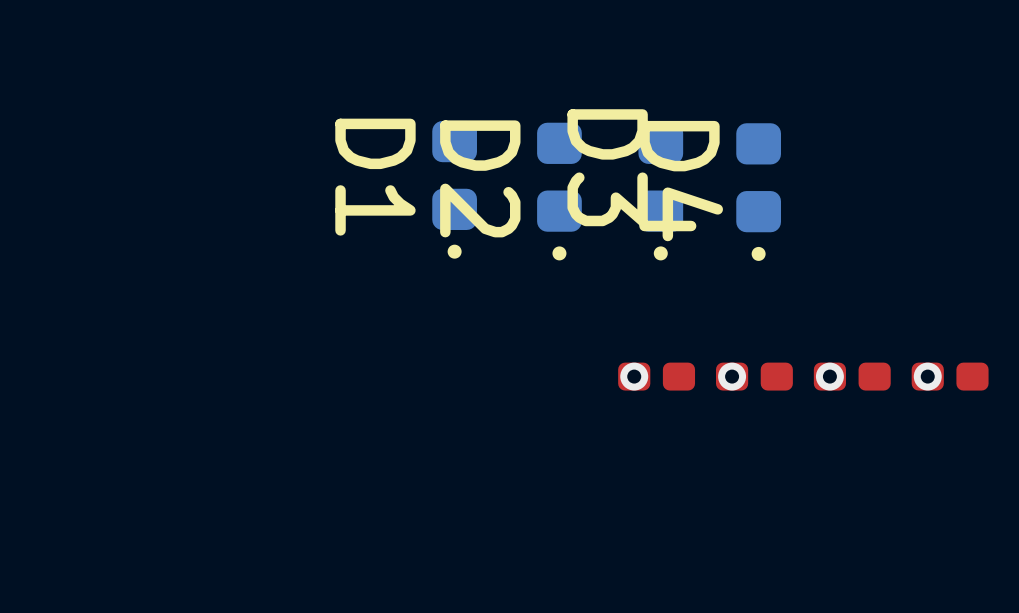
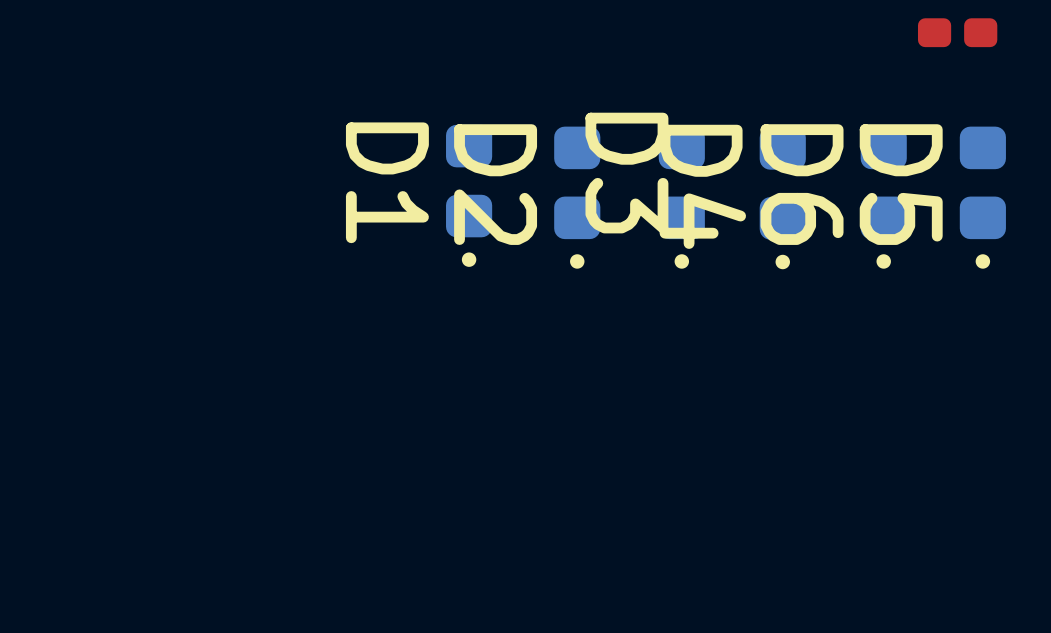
part: none -> (957, 32)
D6: none -> (883, 197)
D5: none -> (982, 197)
via: (634, 376) -> none
part: (656, 376) -> none
via: (732, 376) -> none
part: (754, 376) -> none
via: (829, 376) -> none
part: (852, 376) -> none
via: (927, 376) -> none
part: (950, 376) -> none

